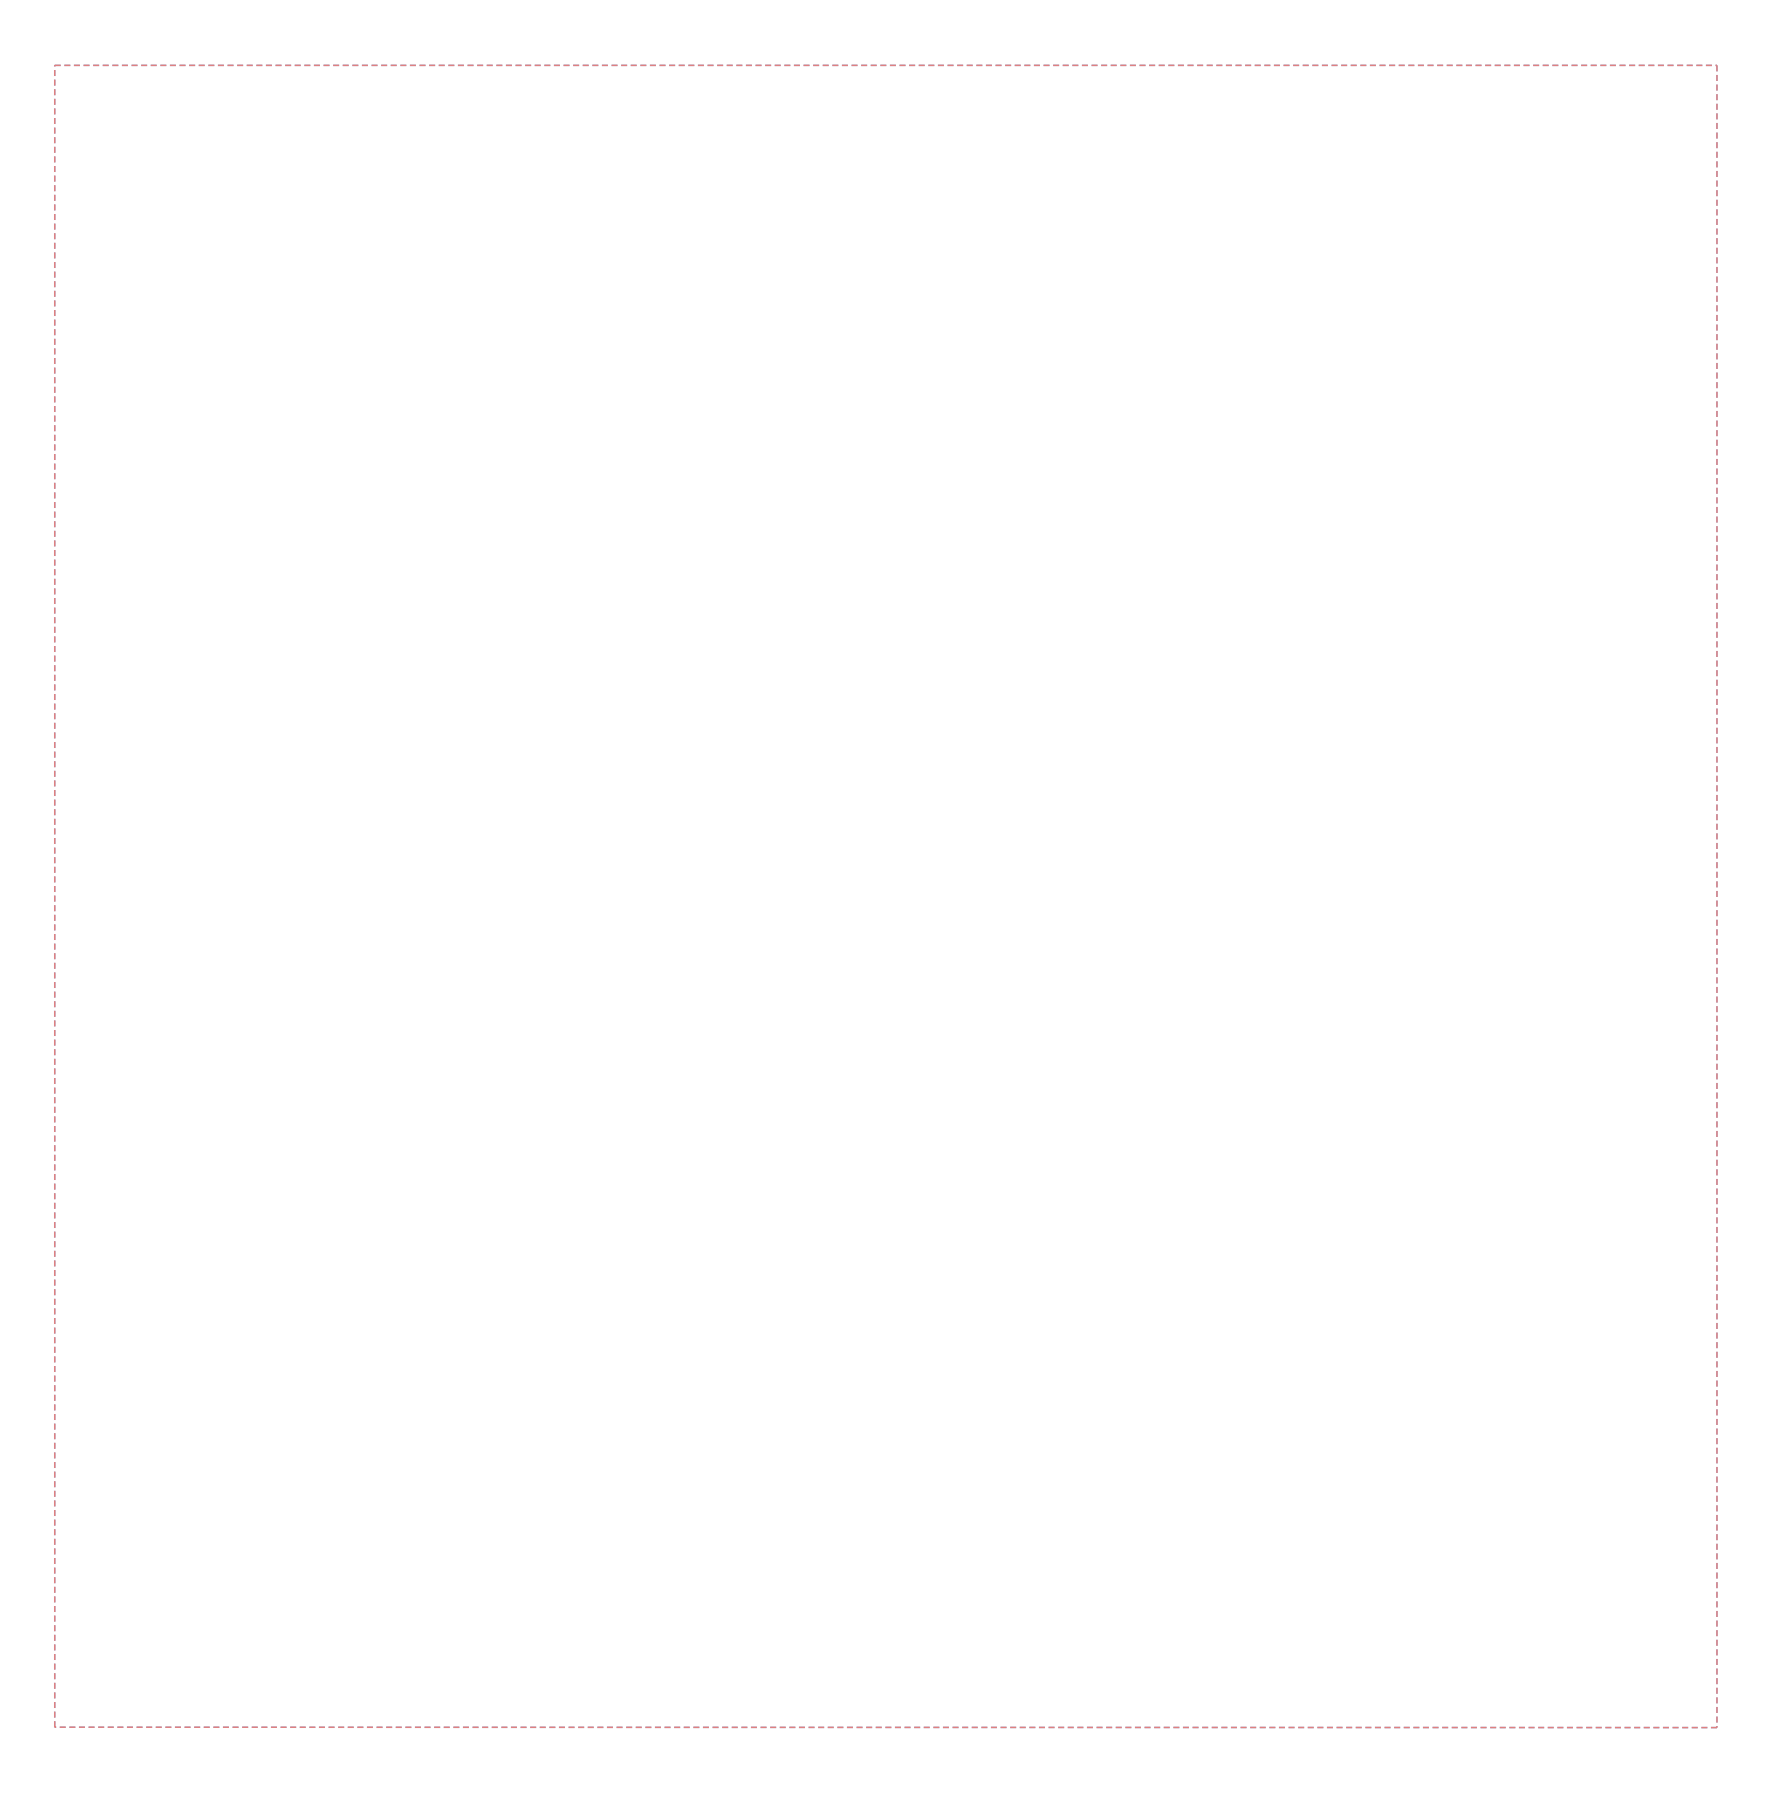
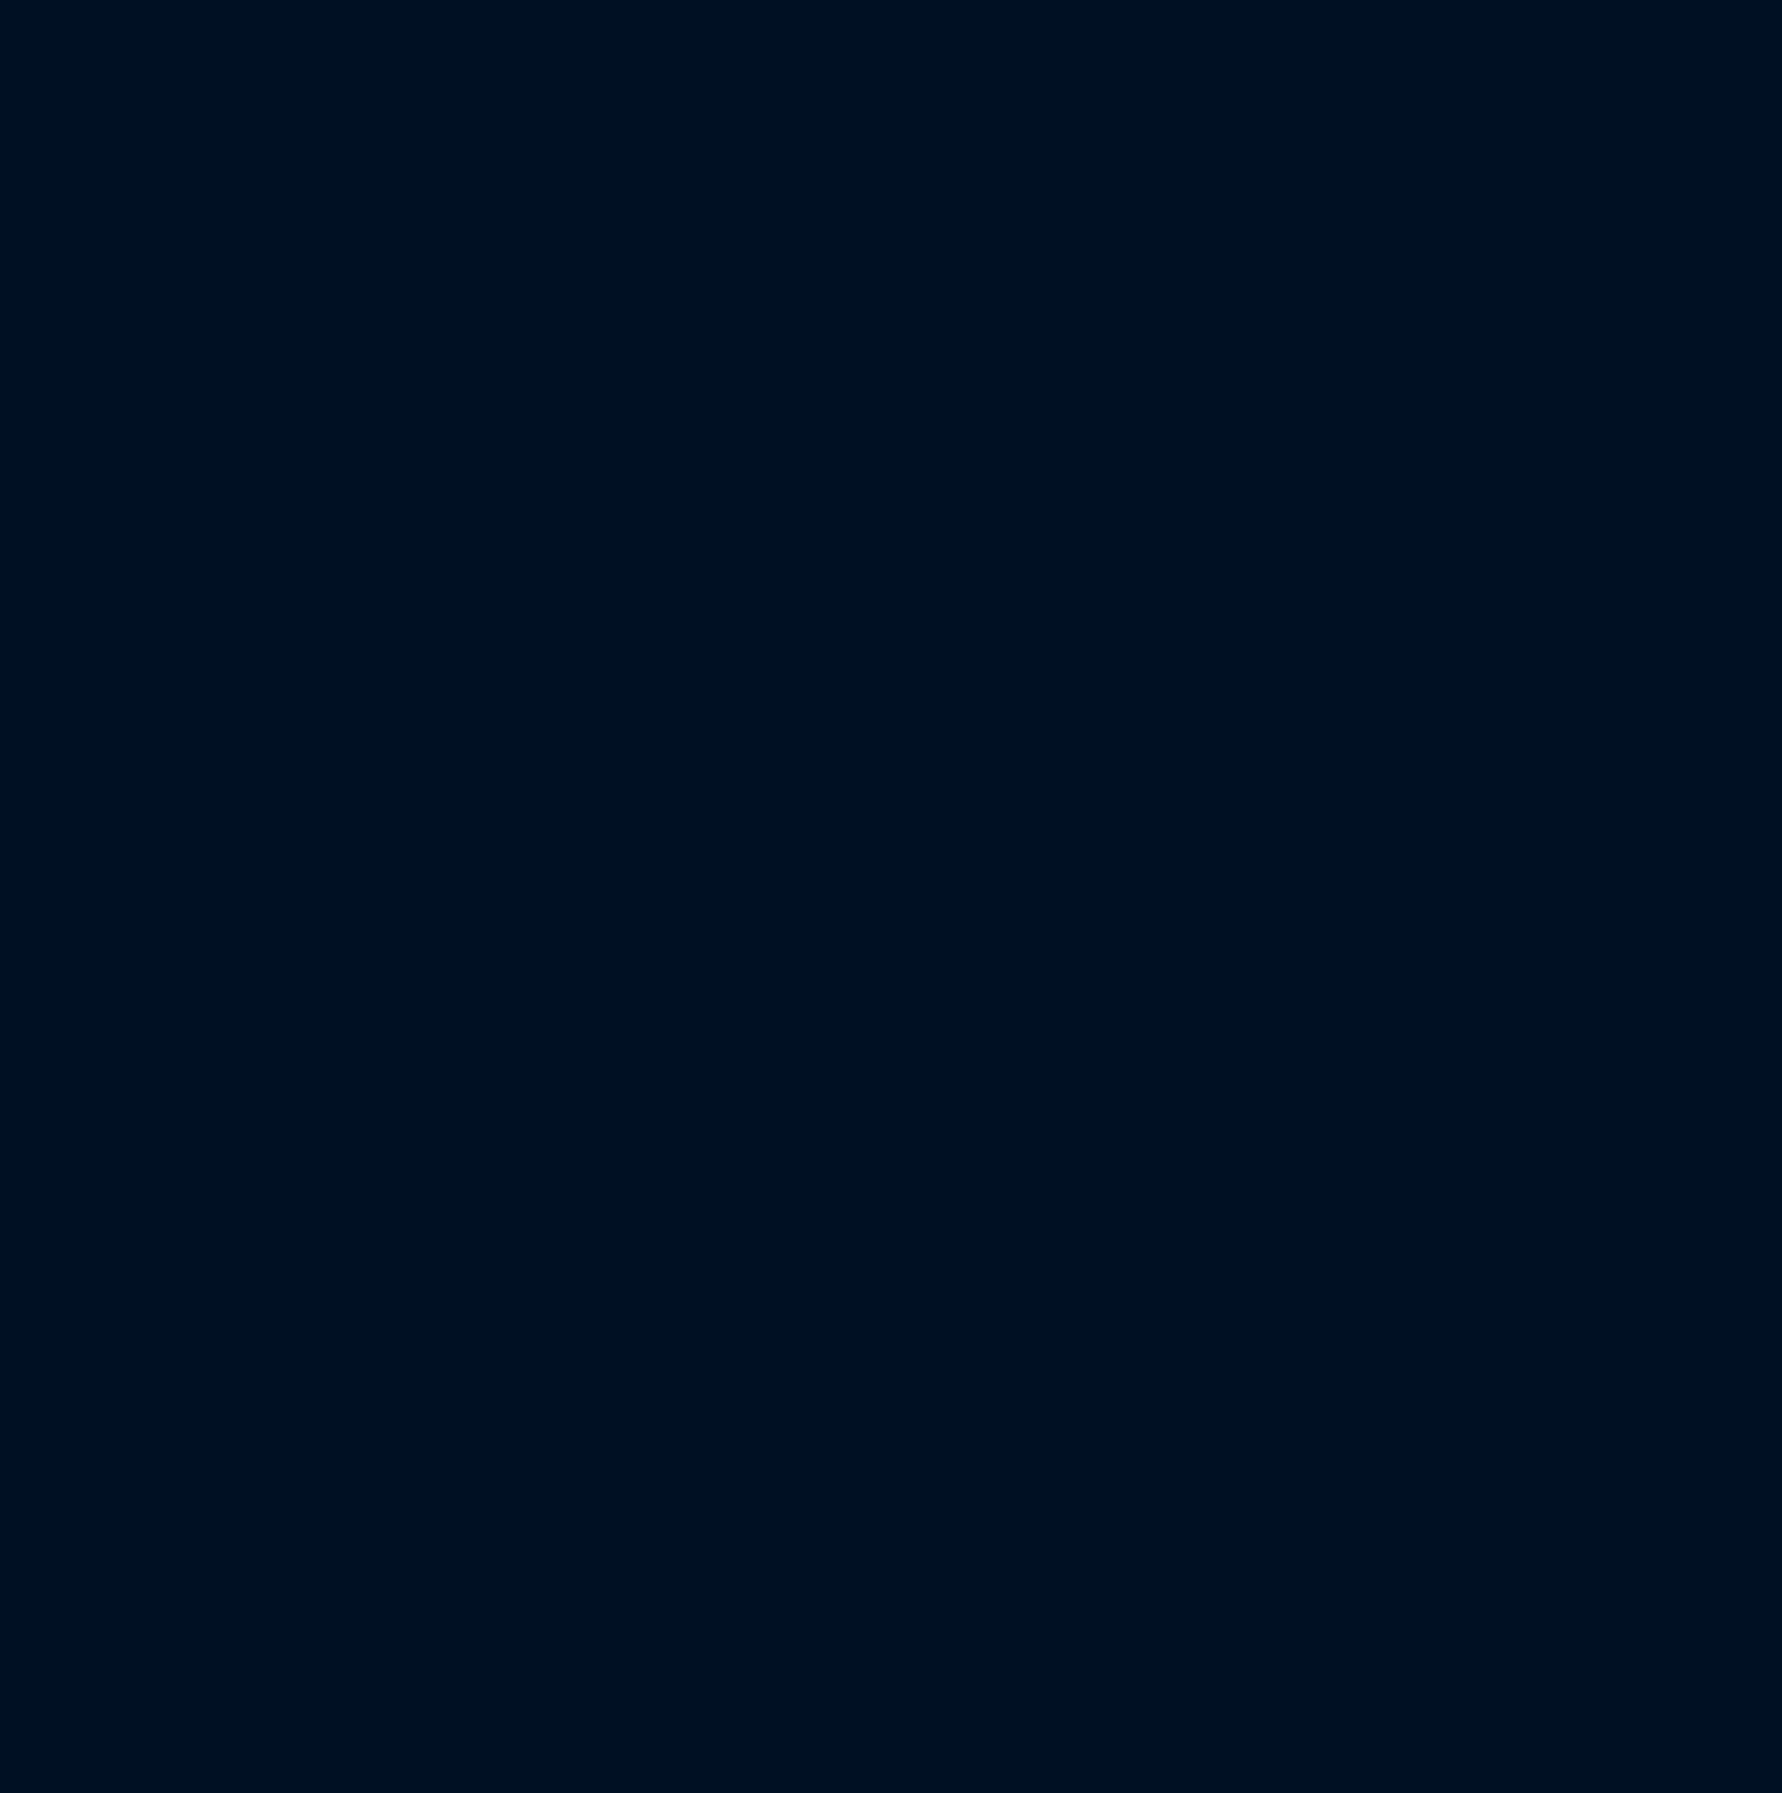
top zone outline: (54, 65) (54, 1727) (1716, 1727) (1716, 65) (54, 65) -> none

